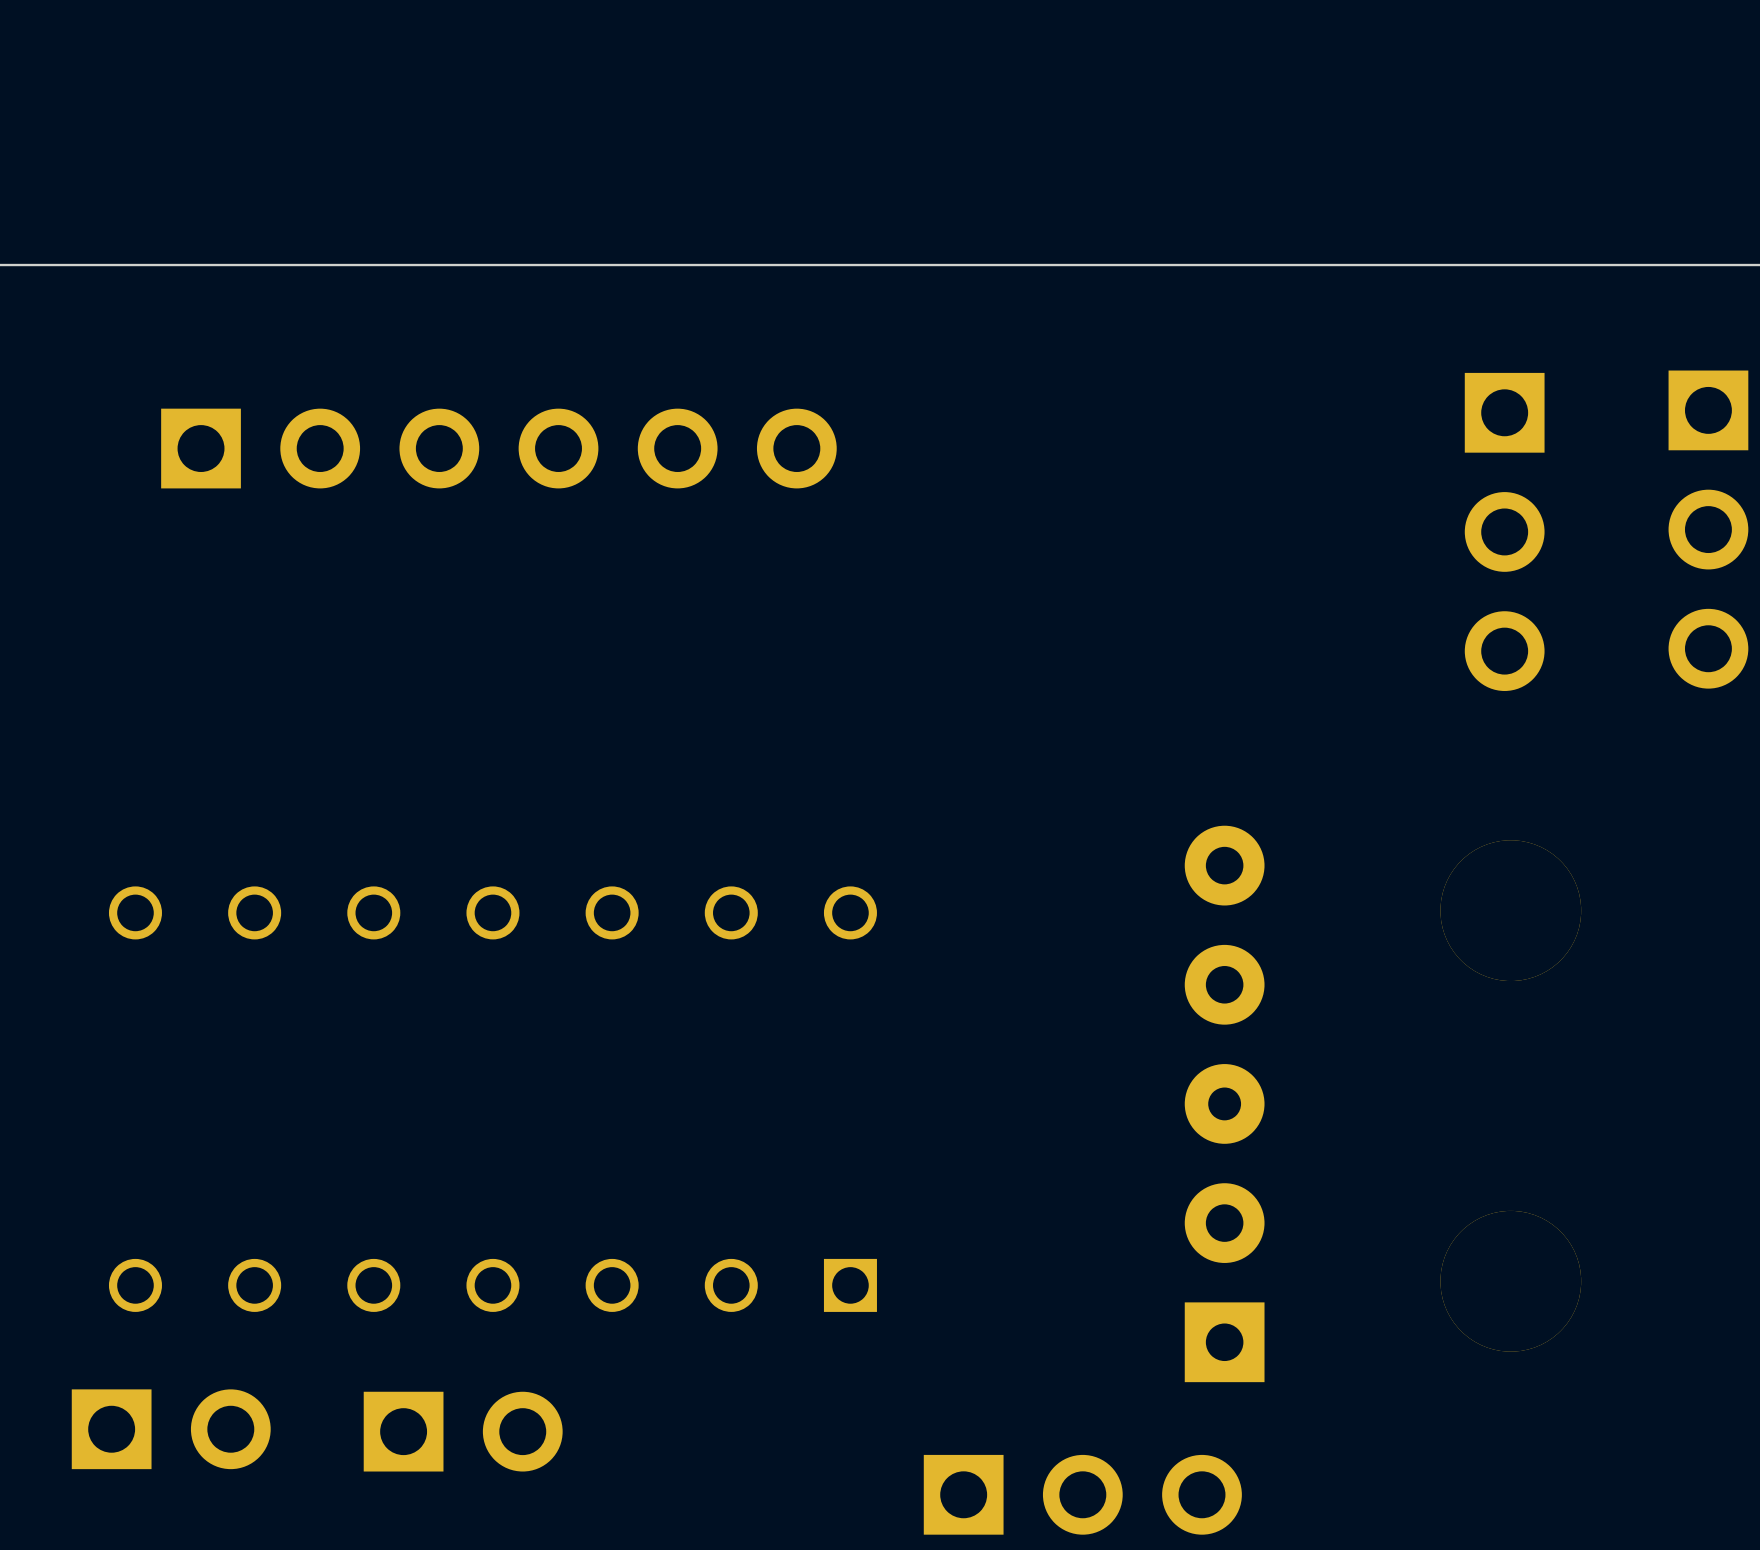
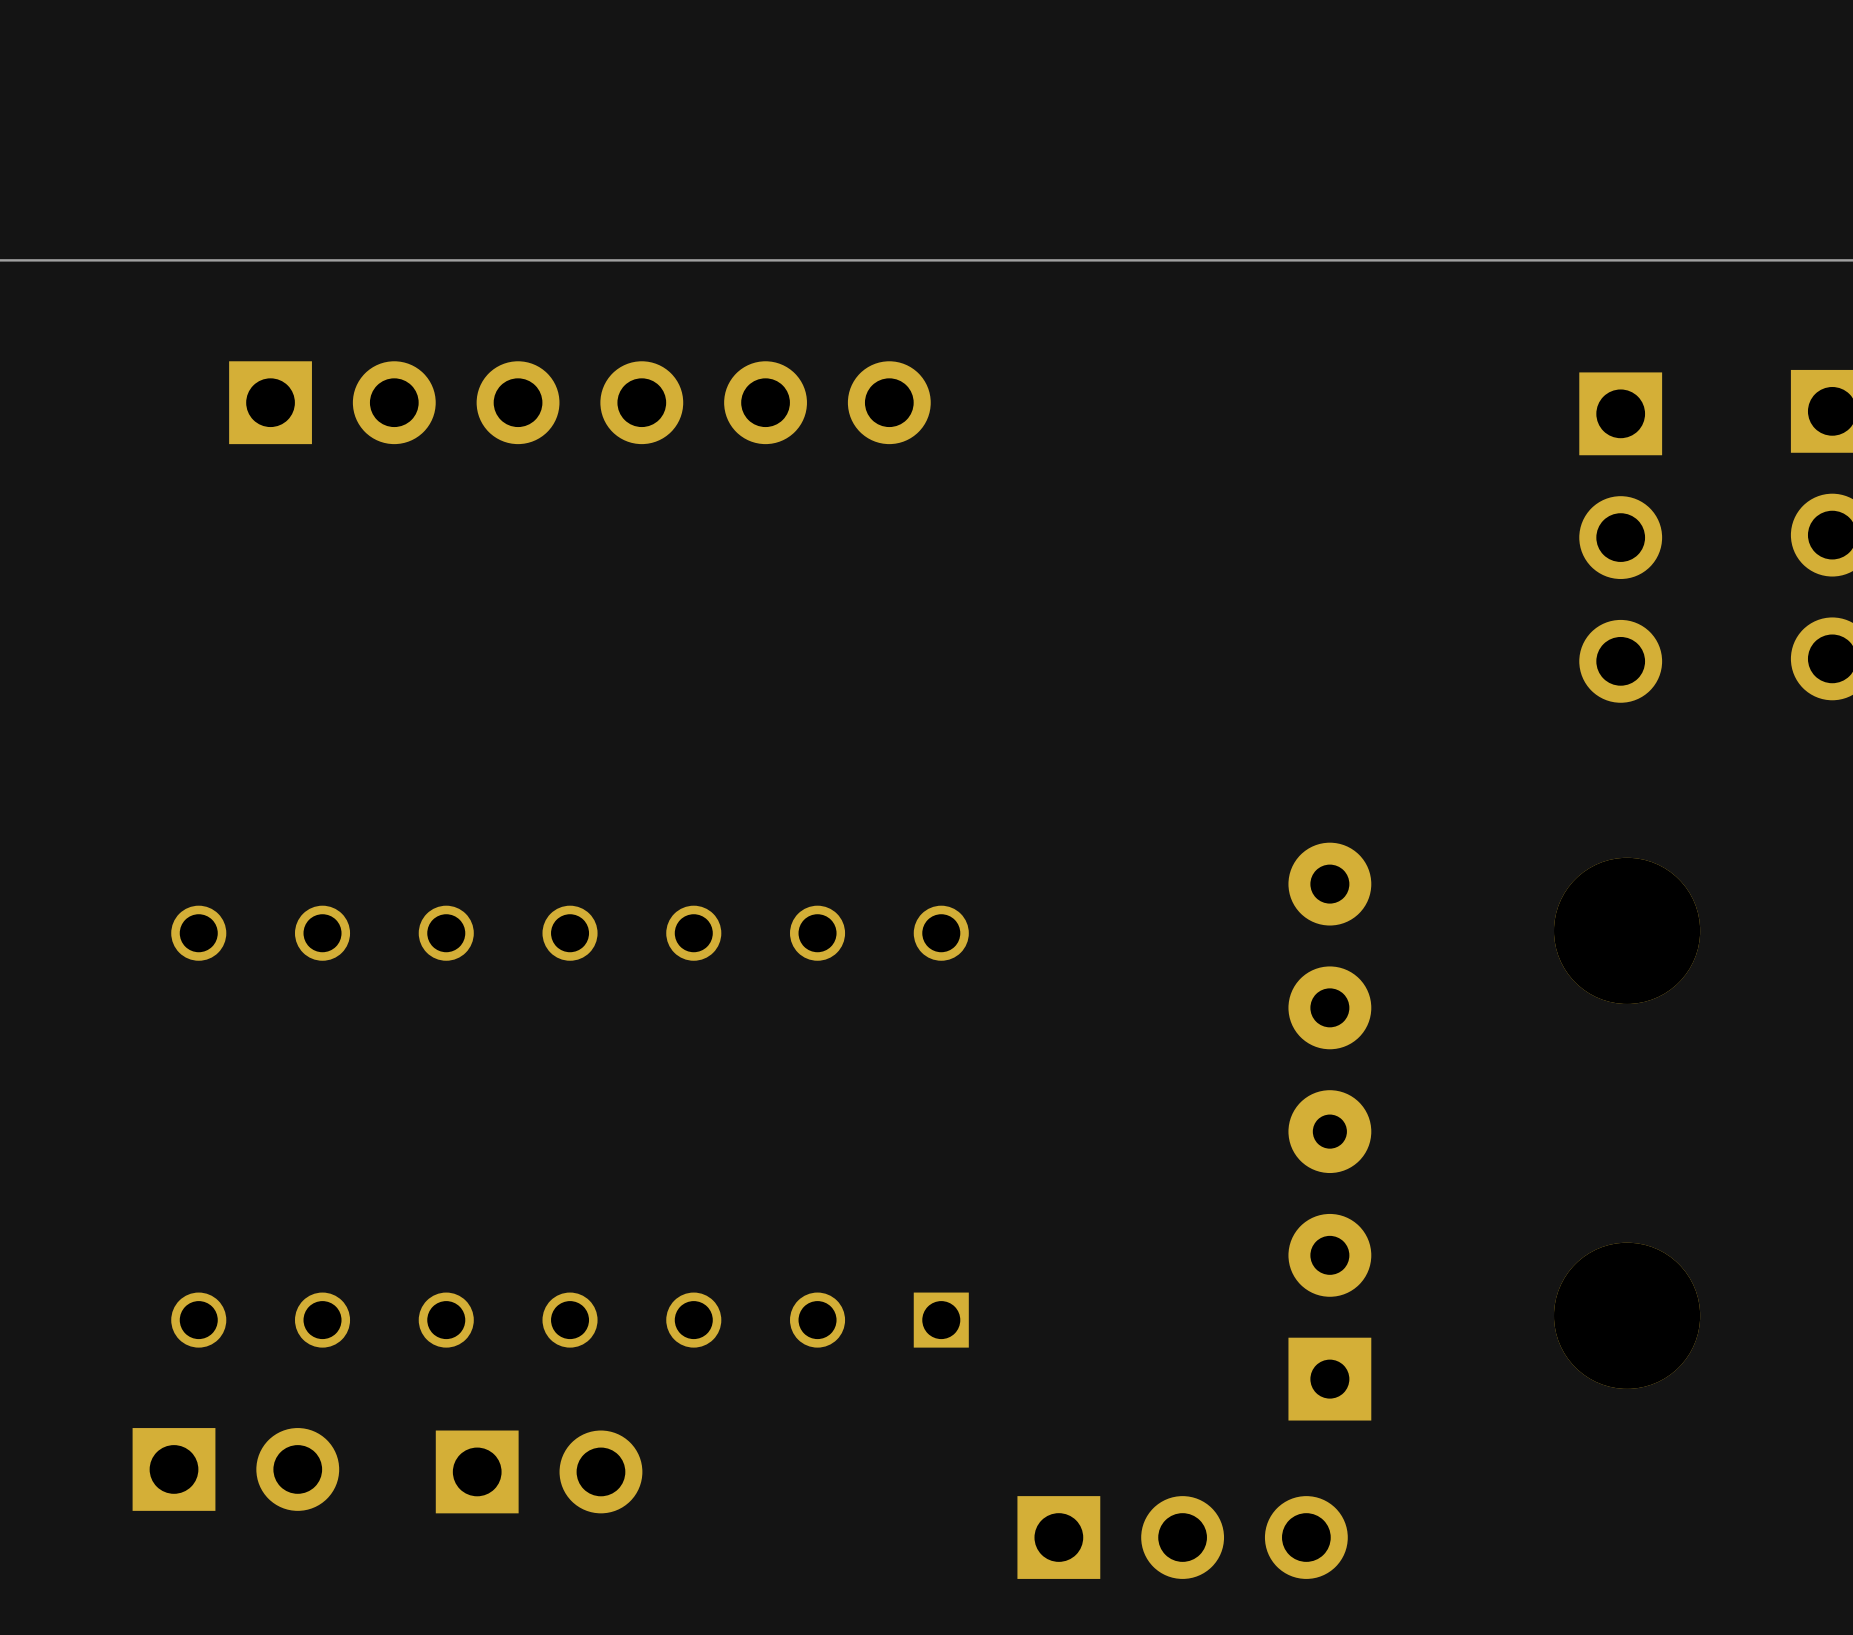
part position: (498, 448) -> (579, 402)

